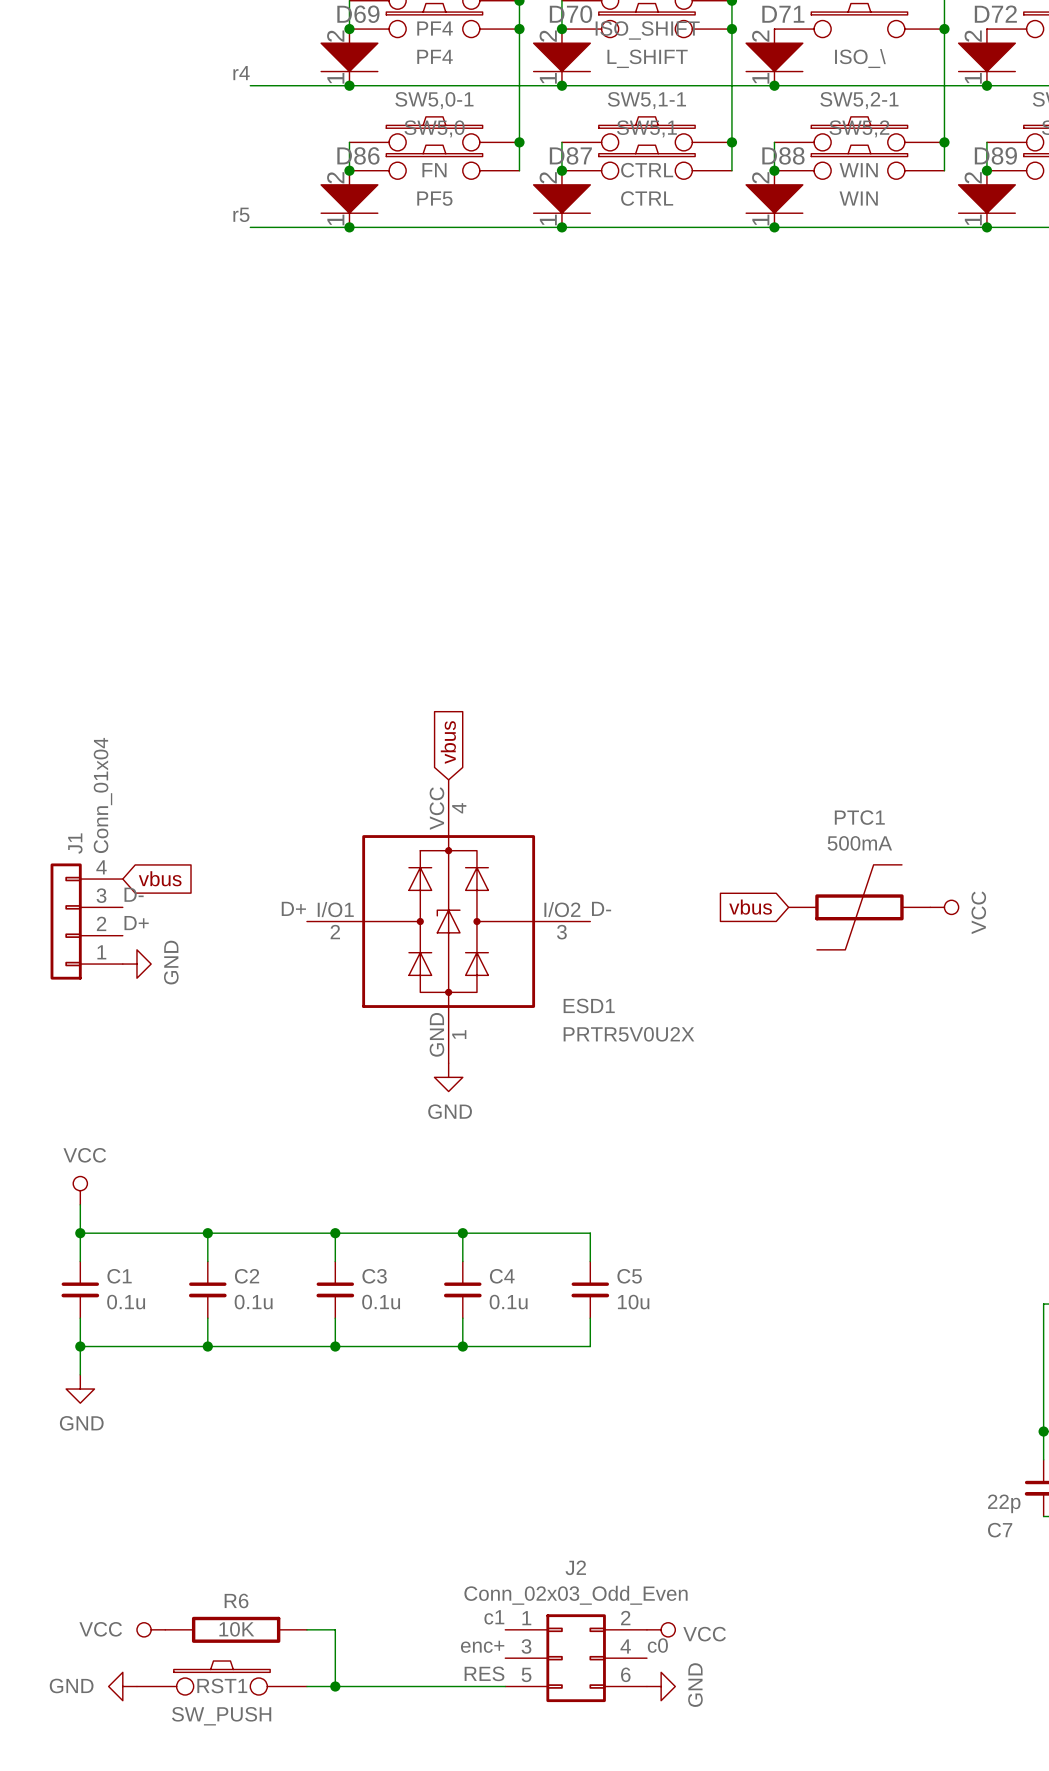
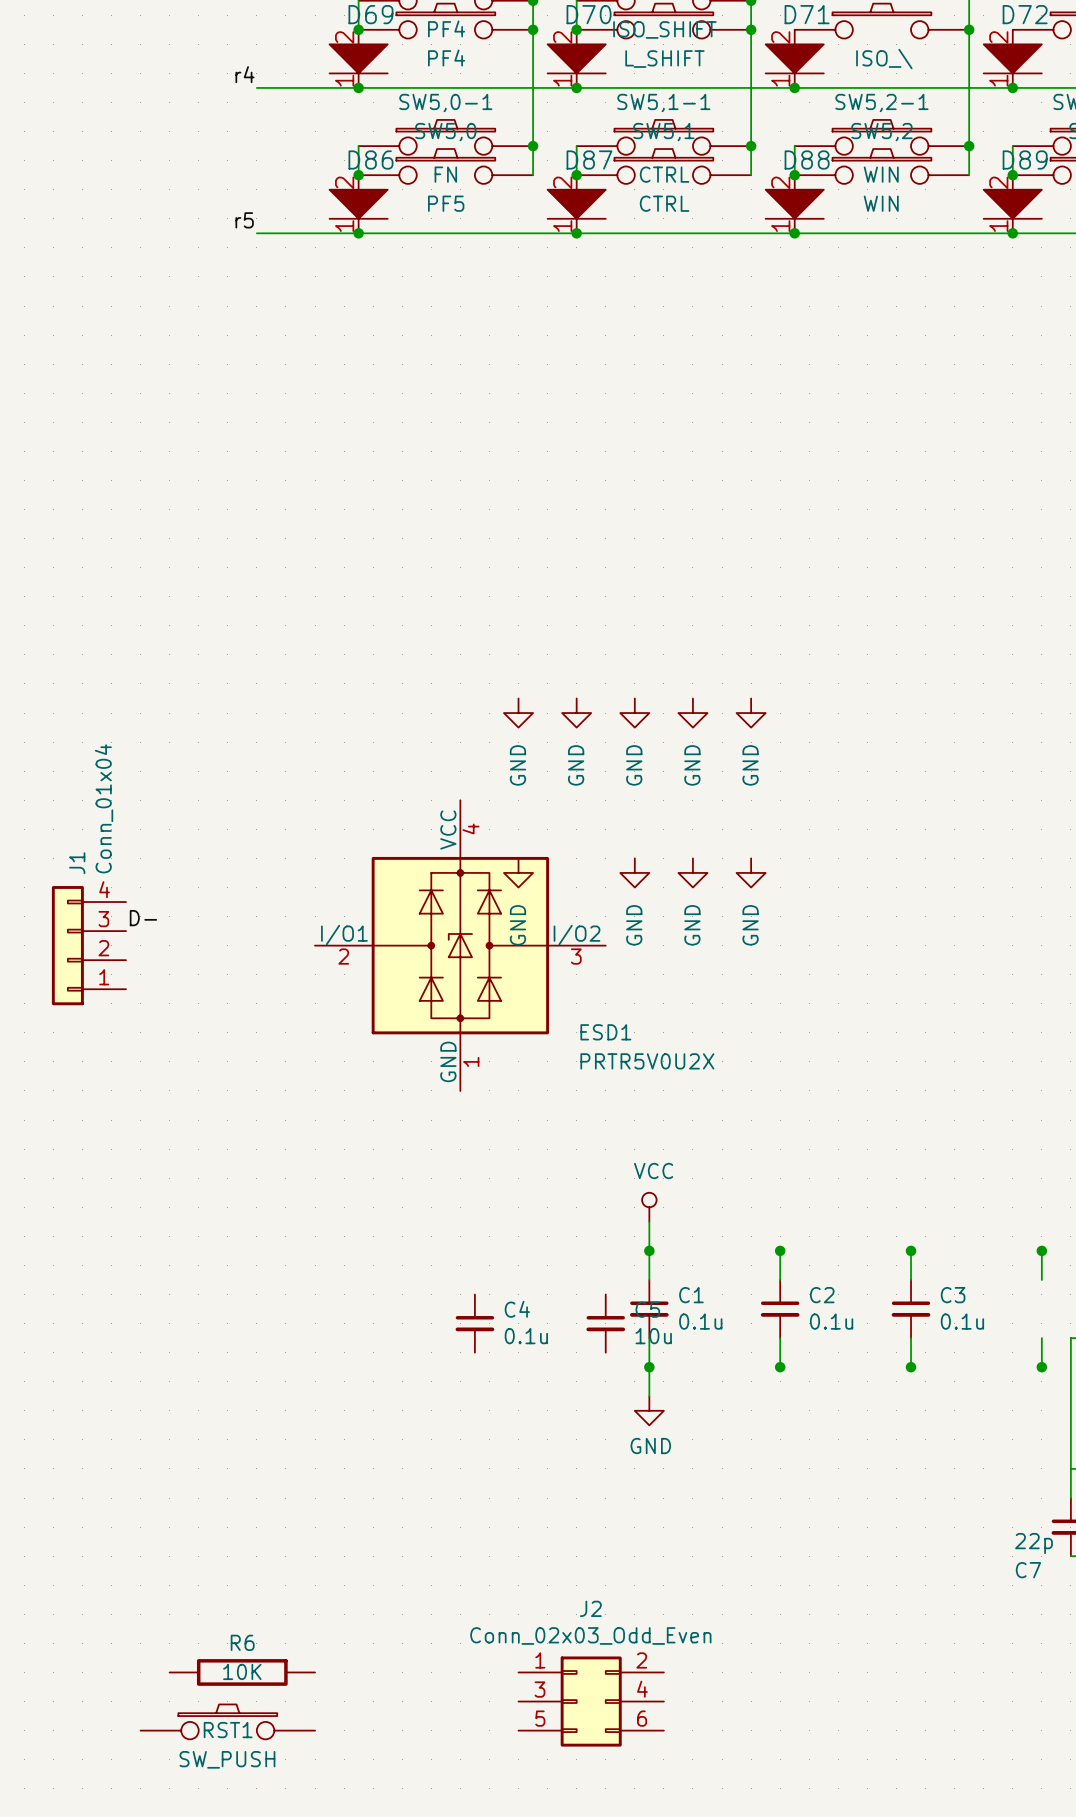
power symbol: none -> GND (518, 713)
power symbol: none -> GND (576, 713)
power symbol: none -> GND (634, 713)
power symbol: none -> GND (692, 713)
power symbol: none -> GND (751, 713)
global label: vbus (448, 742) -> none
power symbol: none -> GND (518, 872)
power symbol: none -> GND (634, 872)
power symbol: none -> GND (692, 872)
power symbol: none -> GND (751, 872)
global label: vbus (160, 878) -> none
global label: vbus (750, 907) -> none
PTC1: 500mA (859, 907) -> none
power symbol: VCC (944, 907) -> none
label: D+ (293, 908) -> none
label: D- (601, 908) -> none
label: D+ (136, 923) -> none
power symbol: GND (136, 964) -> none
power symbol: GND (448, 1077) -> none
power symbol: none -> VCC (649, 1207)
power symbol: VCC (80, 1190) -> none
wire: none -> (649, 1221) (649, 1279)
wire: (80, 1204) (80, 1261) -> none
junction: none -> (649, 1250)
wire: none -> (780, 1250) (780, 1279)
junction: none -> (780, 1250)
wire: none -> (911, 1250) (911, 1279)
junction: none -> (911, 1250)
wire: none -> (1041, 1250) (1041, 1279)
junction: none -> (1041, 1250)
wire: (80, 1233) (590, 1233) (590, 1261) -> none
junction: (80, 1233) -> none
wire: (207, 1233) (207, 1261) -> none
junction: (207, 1233) -> none
wire: (335, 1233) (335, 1261) -> none
junction: (335, 1233) -> none
wire: (462, 1233) (462, 1261) -> none
junction: (462, 1233) -> none
C1 position: (80, 1289) -> (649, 1309)
C2 position: (207, 1289) -> (780, 1309)
C3 position: (335, 1289) -> (911, 1309)
wire: none -> (649, 1338) (649, 1396)
wire: none -> (780, 1338) (780, 1367)
wire: none -> (911, 1338) (911, 1367)
wire: none -> (1041, 1338) (1041, 1367)
wire: (80, 1318) (80, 1374) -> none
wire: (207, 1318) (207, 1346) -> none
wire: (335, 1318) (335, 1346) -> none
wire: (462, 1318) (462, 1346) -> none
wire: (590, 1318) (590, 1346) (80, 1346) -> none
junction: none -> (649, 1367)
junction: none -> (780, 1367)
junction: none -> (911, 1367)
junction: none -> (1041, 1367)
junction: (80, 1346) -> none
junction: (207, 1346) -> none
junction: (335, 1346) -> none
junction: (462, 1346) -> none
power symbol: none -> GND (649, 1410)
power symbol: GND (80, 1389) -> none
junction: (1043, 1431) -> none
label: c1 (494, 1617) -> none
power symbol: VCC (151, 1629) -> none
wire: (306, 1629) (335, 1629) (335, 1686) -> none
power symbol: VCC (661, 1629) -> none
label: c0 (657, 1645) -> none
label: enc+ (482, 1646) -> none
label: RES (484, 1673) -> none
power symbol: GND (122, 1686) -> none
wire: (306, 1686) (505, 1686) -> none
junction: (335, 1686) -> none
power symbol: GND (661, 1686) -> none

